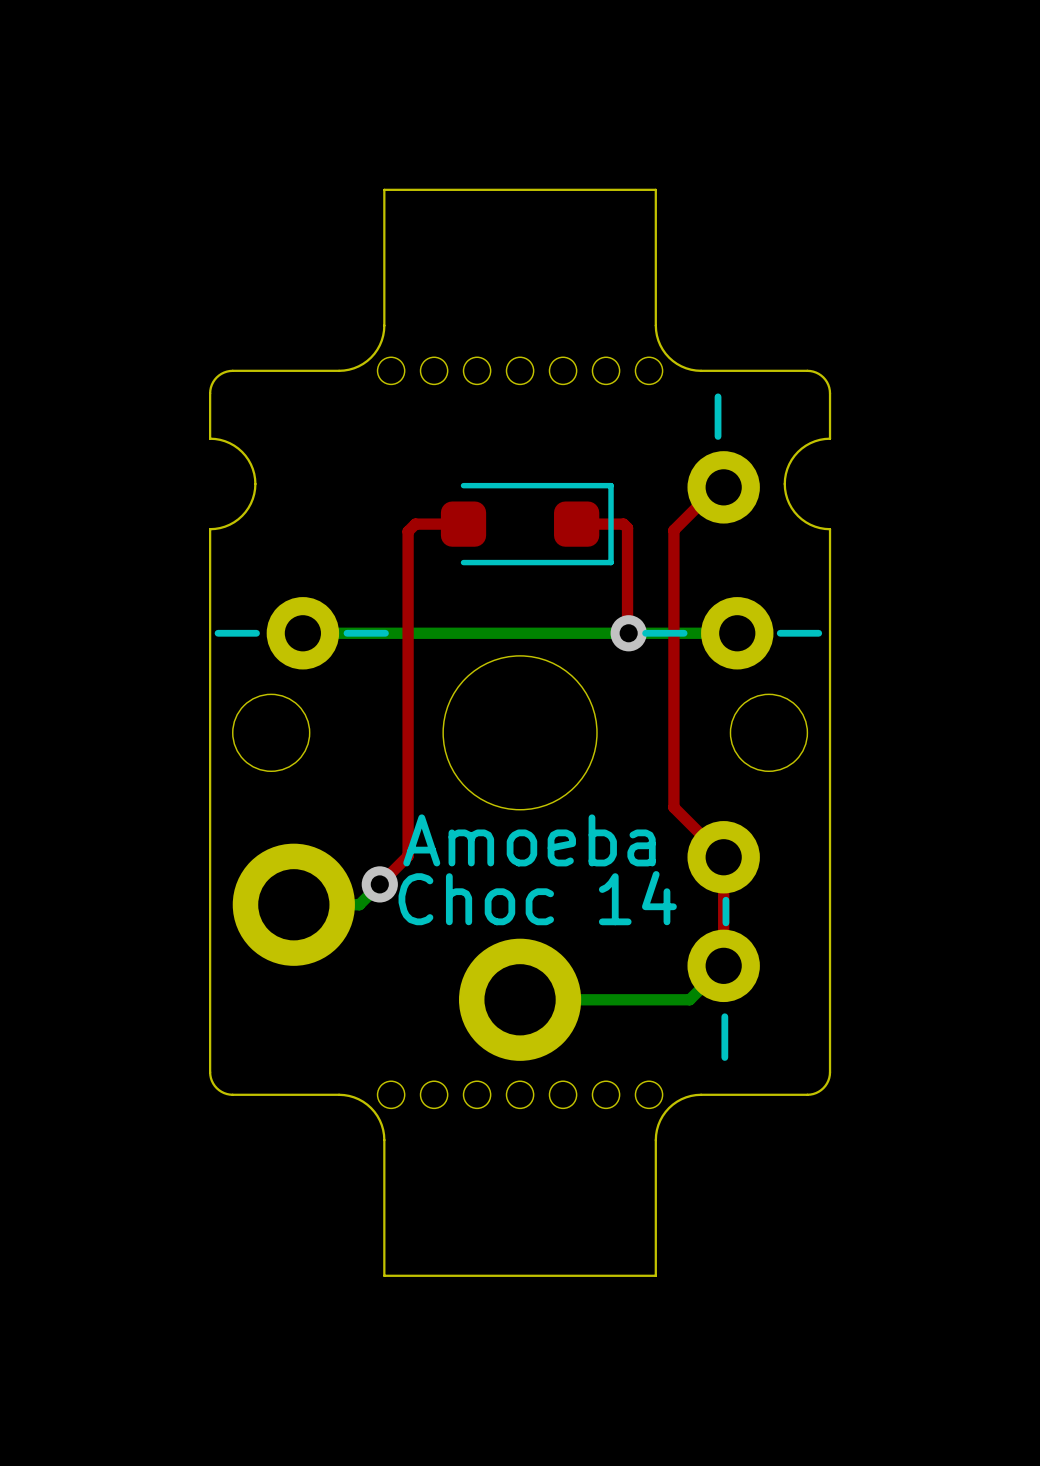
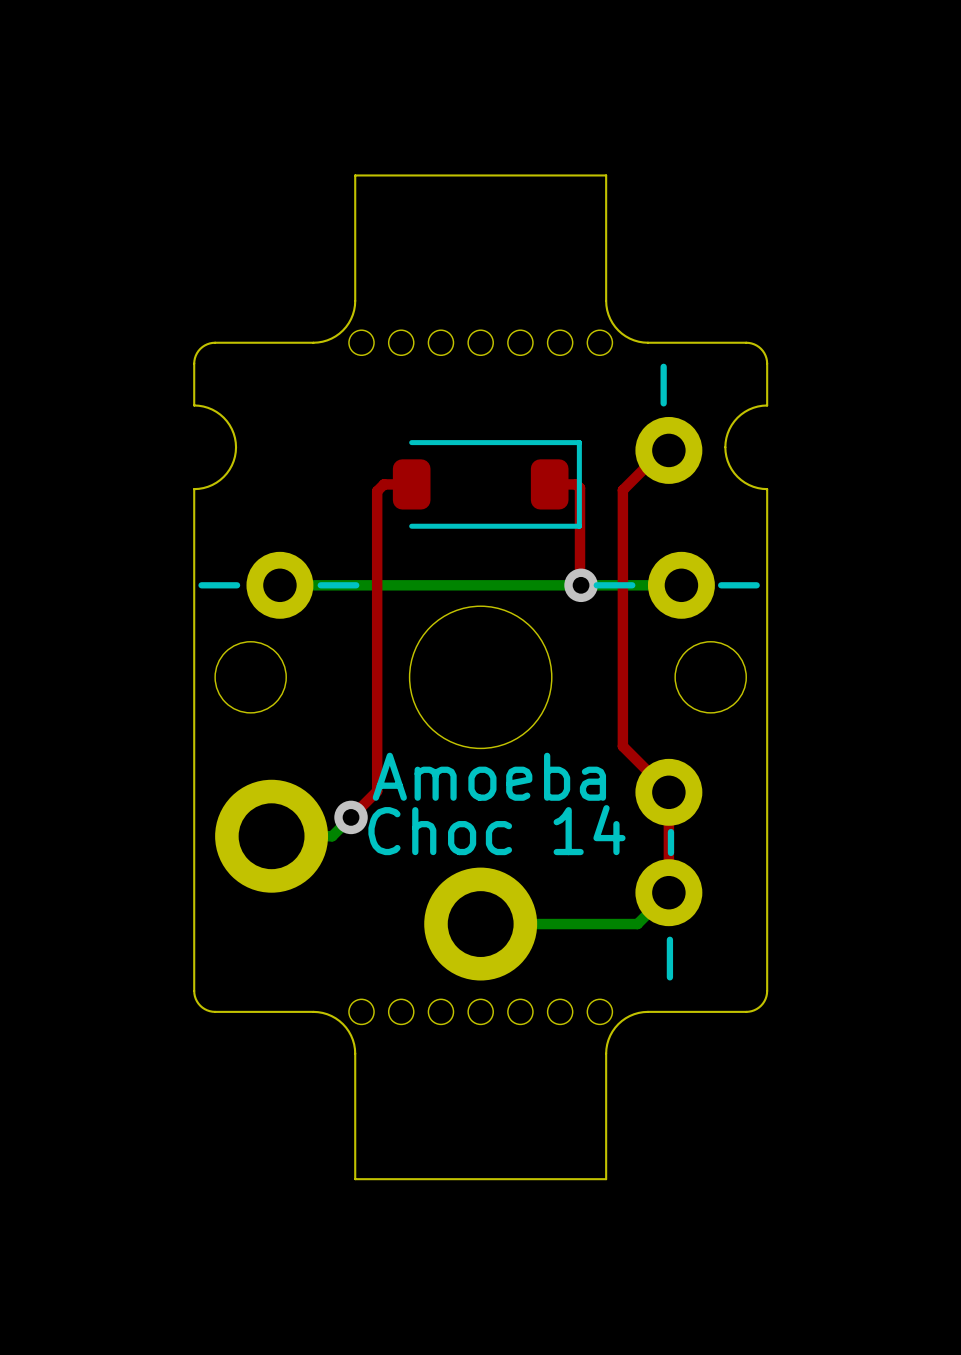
part footprint: [440, 482, 614, 566] -> [392, 440, 582, 529]

